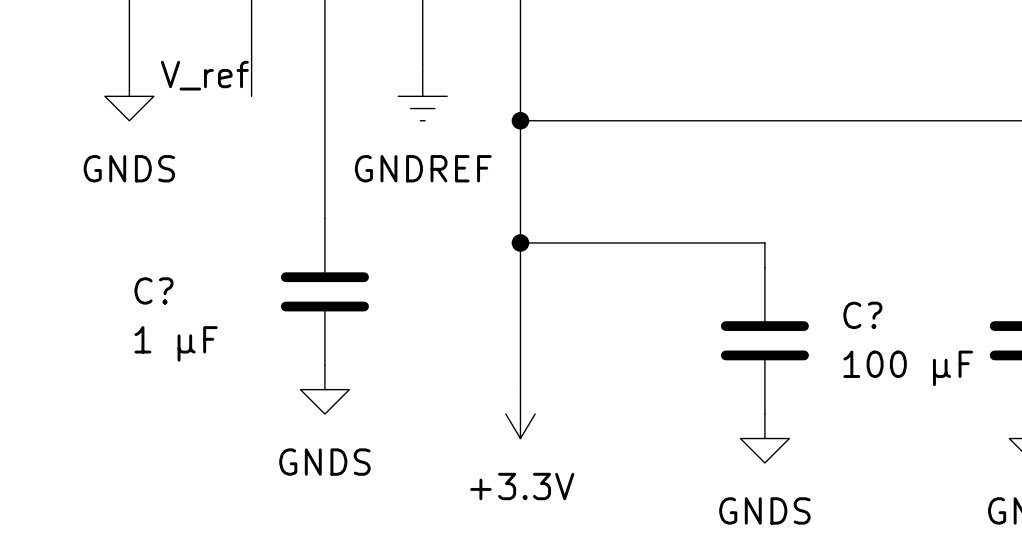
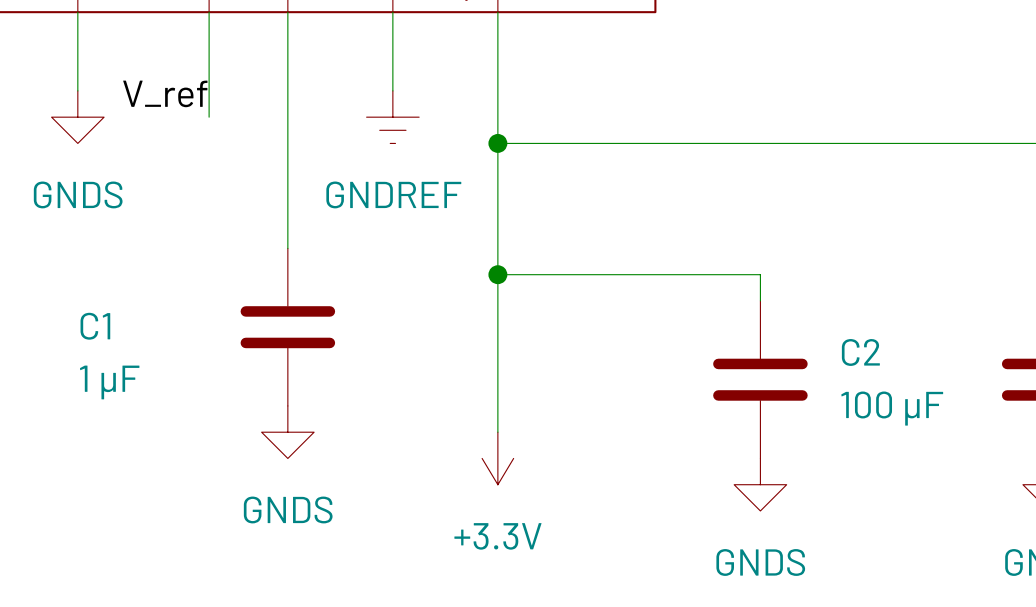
C? name: C? (154, 290) -> C1 (95, 326)
C? name: C? (862, 315) -> C2 (860, 352)

